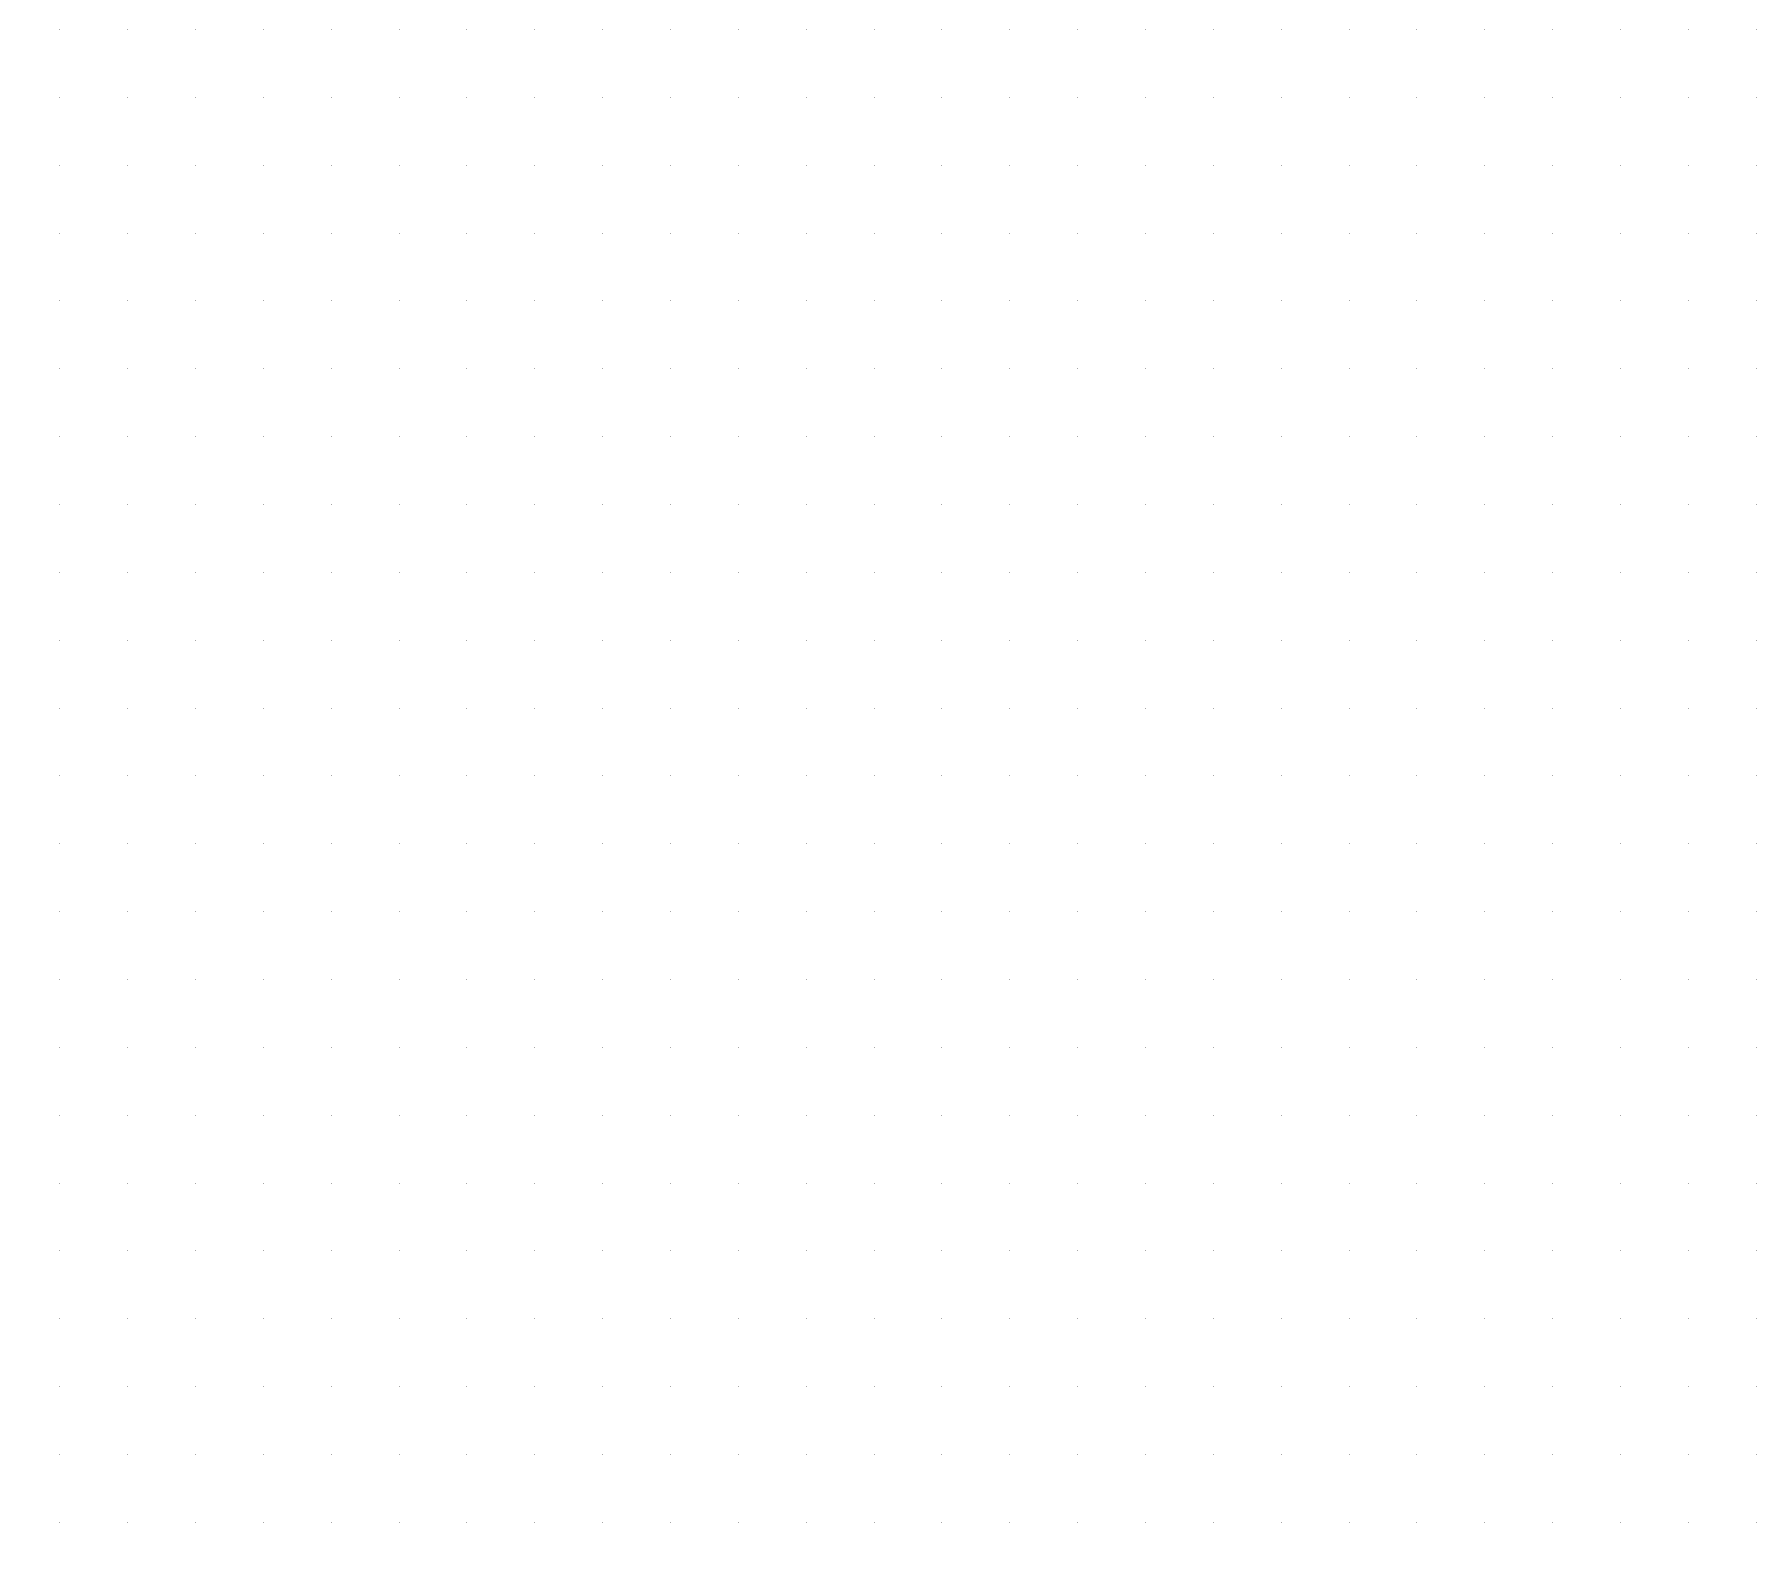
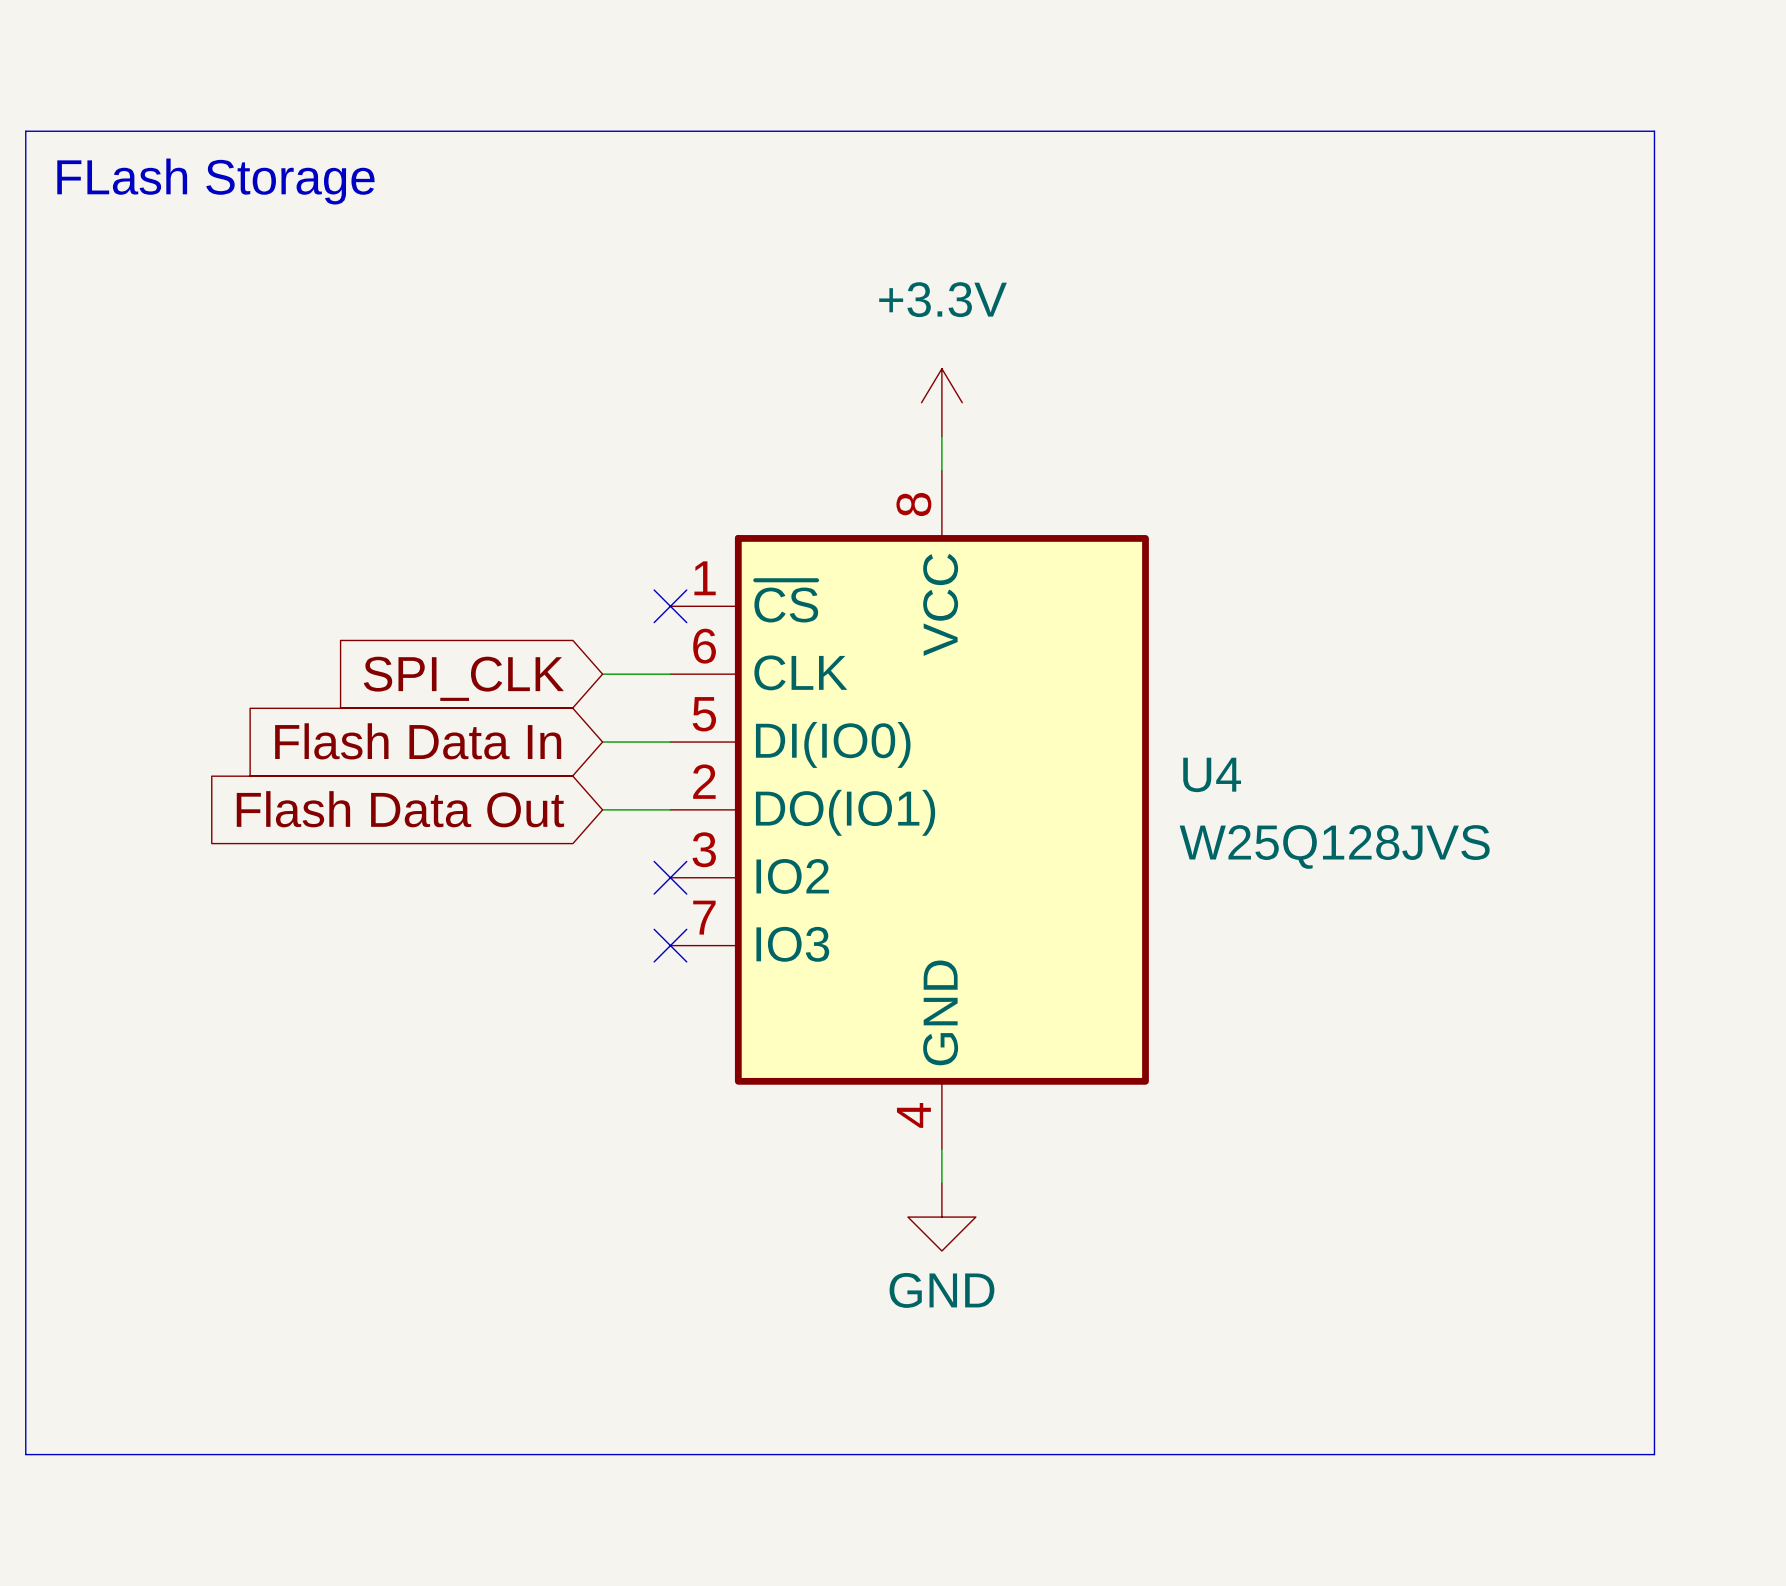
line: none -> (25, 131) (1654, 131) (1654, 1454) (25, 1454) (25, 131)
text: none -> FLash Storage (215, 181)
power symbol: none -> +3.3V (941, 402)
wire: none -> (941, 436) (941, 470)
no-connect mark: none -> (670, 606)
wire: none -> (602, 674) (670, 674)
global label: none -> SPI_CLK (463, 678)
global label: none -> Flash Data In (418, 741)
wire: none -> (602, 742) (670, 742)
global label: none -> Flash Data Out (400, 809)
wire: none -> (602, 809) (670, 809)
U4: none -> W25Q128JVS (909, 809)
no-connect mark: none -> (670, 877)
no-connect mark: none -> (670, 945)
wire: none -> (941, 1149) (941, 1183)
power symbol: none -> GND (941, 1217)

